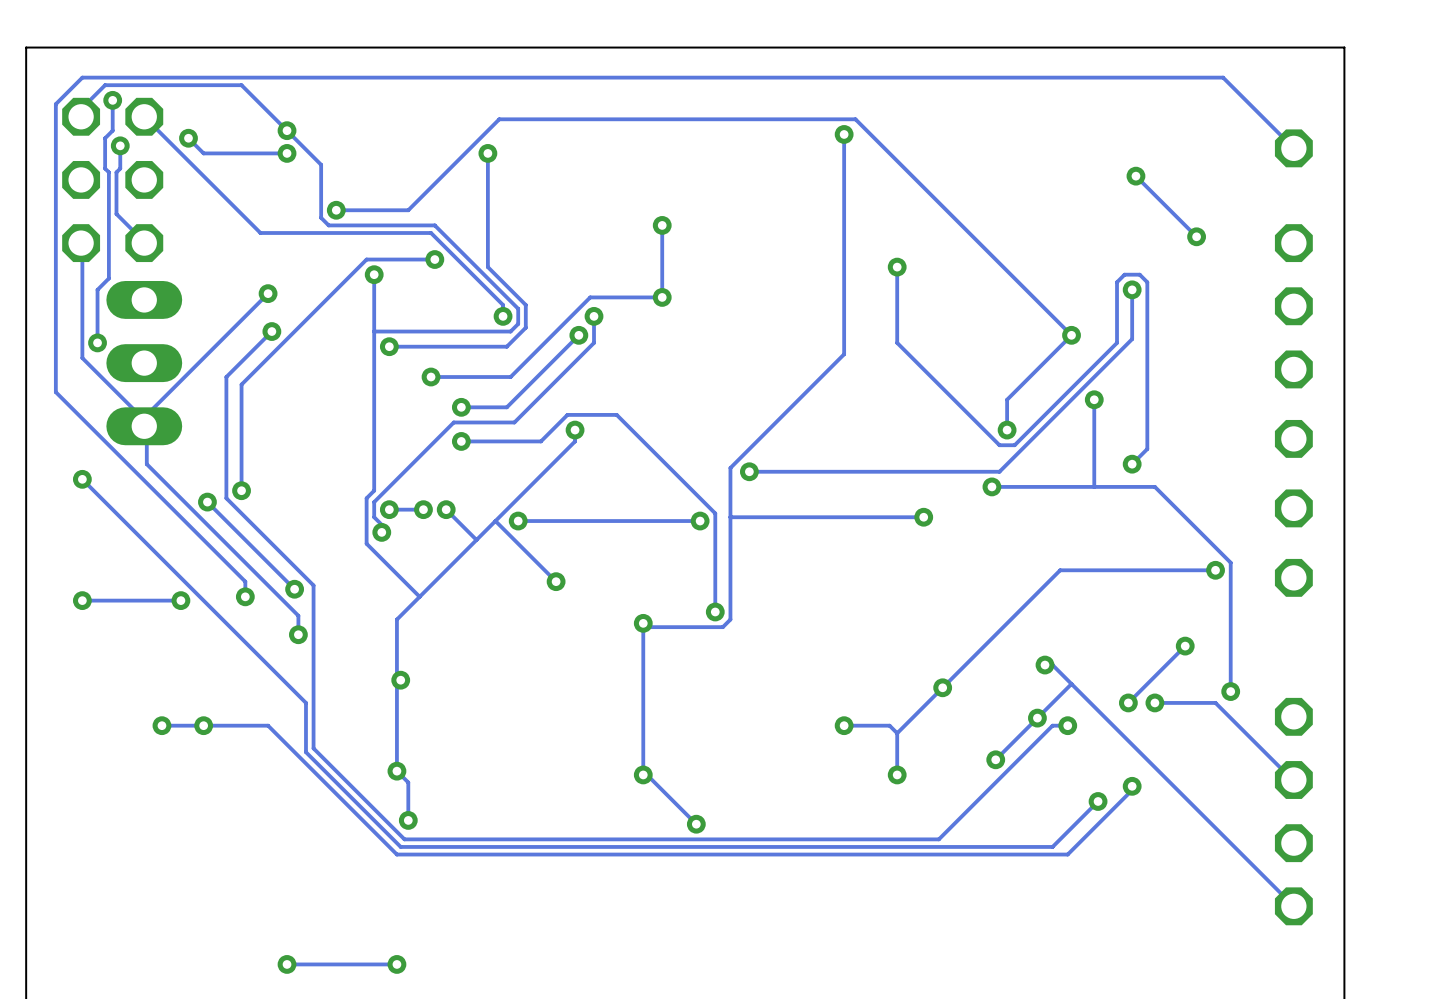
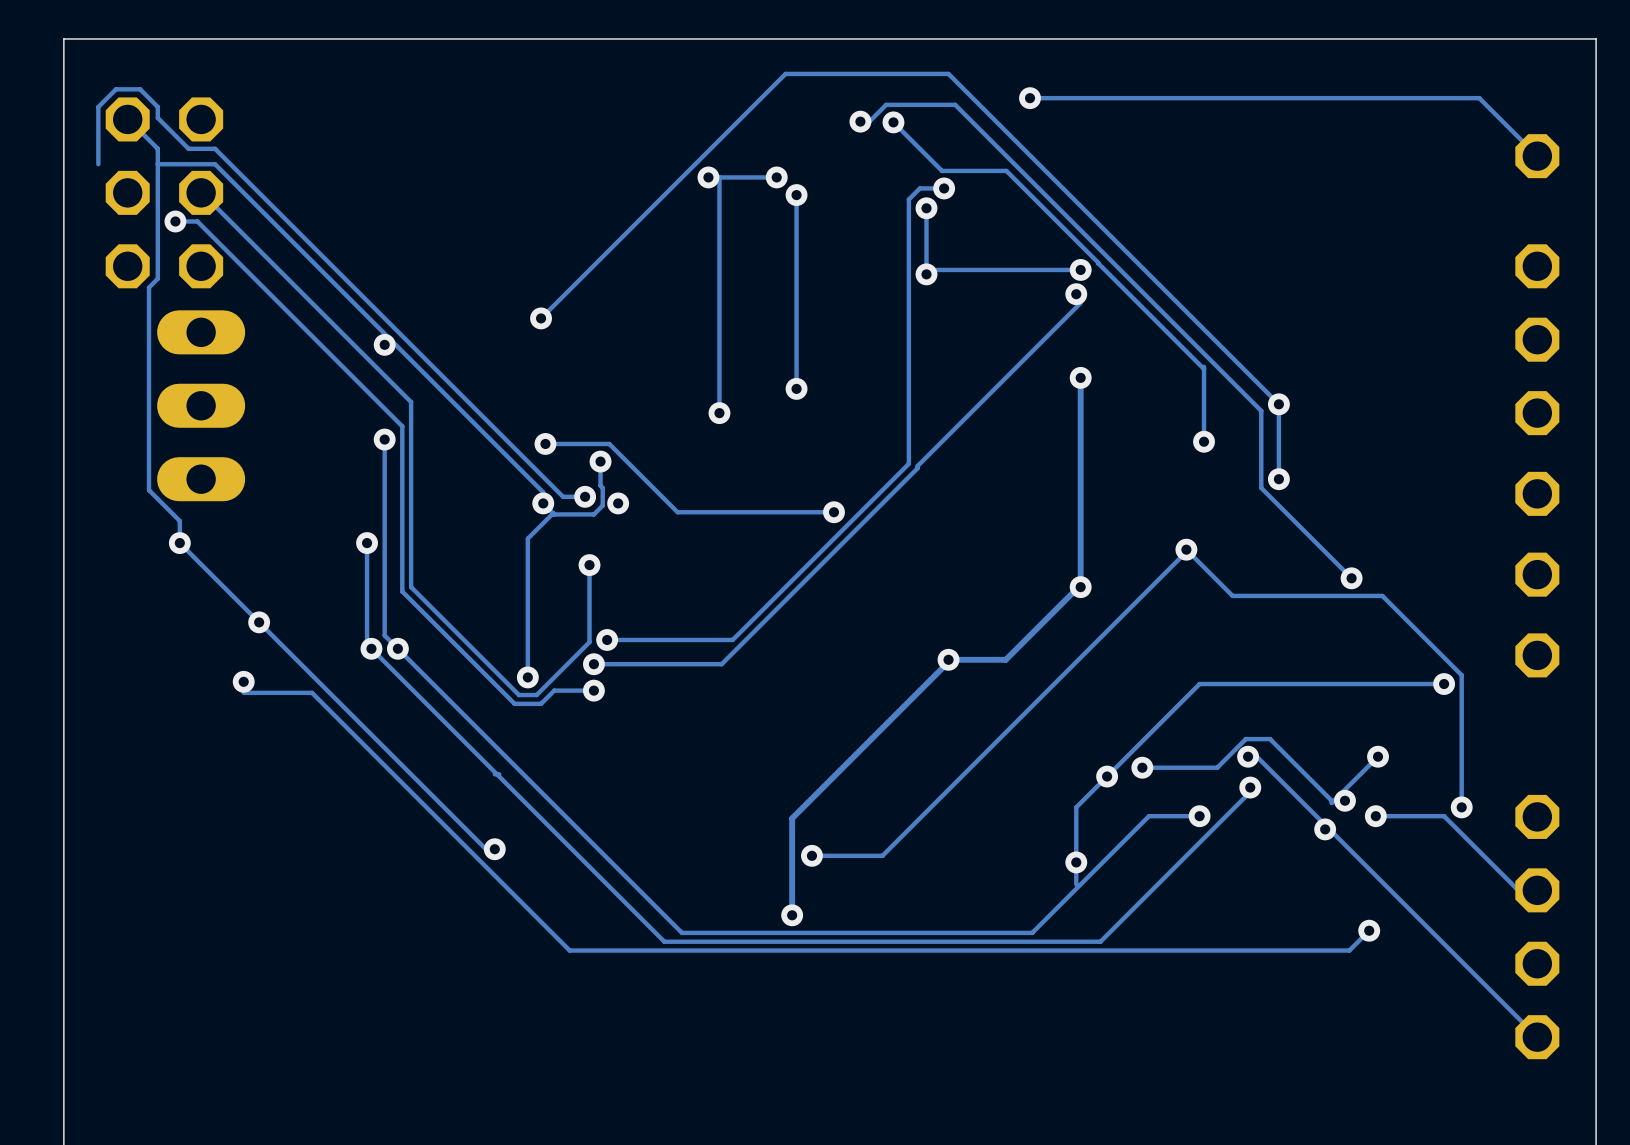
track: (647, 77) (82, 77) (55, 106) -> (569, 496) (563, 496) (215, 148) (188, 148) (157, 117) (157, 106) (140, 89) (115, 89) (98, 106)
track: none -> (785, 73) (541, 318)
track: (787, 77) (1223, 77) (1243, 98) -> (1030, 98) (1479, 98)
track: none -> (948, 73) (1278, 404) (1278, 479)
via: none -> (1030, 98)
track: (112, 100) (112, 130) (105, 138) (105, 168) (108, 172) (108, 278) (97, 289) (97, 342) -> none
via: (112, 100) -> none
track: (81, 116) (82, 107) (105, 85) (241, 85) (321, 164) (321, 217) (328, 225) (434, 225) (518, 308) (518, 323) (510, 331) (374, 331) -> none
track: (144, 116) (260, 233) (431, 233) (503, 305) (503, 316) -> none
track: none -> (860, 121) (869, 121) (886, 104) (955, 104) (1261, 410) (1261, 488) (1351, 578)
via: none -> (860, 121)
track: none -> (893, 122) (942, 170) (1006, 170) (1098, 262)
via: none -> (893, 122)
via: (287, 130) -> none
track: (844, 134) (844, 354) (730, 467) (730, 619) (722, 627) (643, 627) -> none
via: (844, 134) -> none
track: (188, 138) (203, 153) (287, 153) -> none
via: (188, 138) -> none
track: (120, 145) (120, 168) (116, 172) (116, 214) (144, 243) -> none
via: (120, 145) -> none
via: (287, 153) -> none
track: (487, 153) (487, 267) (525, 305) (525, 327) (506, 346) (389, 346) -> none
via: (487, 153) -> none
track: (55, 155) (55, 392) (99, 435) -> (127, 119) (157, 148) (157, 278) (149, 287) (149, 490)
track: none -> (157, 164) (215, 164) (543, 492) (543, 503) (554, 514) (593, 514) (602, 505) (600, 461)
via: none -> (708, 177)
track: none -> (719, 177) (719, 413)
track: none -> (776, 177) (708, 177)
via: none -> (776, 177)
track: none -> (944, 188) (919, 188) (908, 199) (908, 463) (732, 639) (607, 639)
via: none -> (944, 188)
track: (1135, 176) (1196, 236) -> none
via: (1135, 176) -> none
track: none -> (201, 192) (411, 402) (411, 587) (519, 695) (536, 695) (589, 642) (589, 565)
track: none -> (796, 195) (796, 388)
via: none -> (796, 195)
track: none -> (926, 208) (926, 274)
via: none -> (926, 208)
track: none -> (175, 221) (197, 221) (402, 426) (402, 591) (514, 703) (541, 703) (554, 690) (593, 690)
via: none -> (175, 221)
track: (336, 210) (408, 210) (499, 119) (855, 119) (1071, 335) (1007, 399) (1007, 430) -> none
via: (336, 210) -> none
track: (662, 225) (662, 297) (590, 297) (510, 377) (431, 377) -> none
via: (662, 225) -> none
via: (1196, 236) -> none
track: none -> (1098, 263) (1204, 369)
track: (81, 243) (82, 358) (143, 418) -> none
track: none -> (1080, 269) (926, 269)
via: none -> (1080, 269)
via: none -> (926, 274)
track: (434, 259) (366, 259) (241, 384) (241, 490) -> none
via position: (434, 259) -> (541, 318)
track: (897, 267) (897, 342) (999, 445) (1014, 445) (1117, 342) (1117, 282) (1124, 274) (1139, 274) (1147, 282) (1147, 449) (1132, 464) -> none
track: (374, 274) (374, 490) (366, 498) (366, 543) (419, 596) -> none
via: (374, 274) -> none
track: none -> (1080, 302) (721, 664) (593, 664)
track: (1132, 289) (1132, 339) (999, 471) (749, 471) -> none
via: (1132, 289) -> none
track: (268, 293) (143, 418) -> none
via: (268, 293) -> none
via: (662, 297) -> none
via: none -> (384, 344)
via: (503, 316) -> none
track: (594, 316) (594, 342) (514, 422) (453, 422) (374, 502) (374, 517) (381, 524) (381, 532) -> none
via: (594, 316) -> none
track: none -> (1204, 366) (1204, 441)
track: (271, 331) (226, 377) (226, 498) (313, 585) (313, 748) (404, 839) (938, 839) (1052, 725) (1067, 725) -> none
via: (271, 331) -> none
track: (578, 335) (506, 407) (461, 407) -> none
via: (578, 335) -> none
via: (1071, 335) -> none
track: none -> (1080, 377) (1080, 587) (1078, 587) (1005, 659) (948, 659) (948, 662) (792, 818) (792, 915)
via: none -> (1080, 377)
via: (97, 342) -> none
via: (389, 346) -> none
via: none -> (796, 388)
via: none -> (1278, 404)
via: none -> (719, 413)
via: (431, 377) -> none
track: none -> (384, 439) (384, 635) (682, 932) (1032, 932) (1148, 816) (1199, 816)
via: none -> (384, 439)
via: none -> (1204, 441)
track: none -> (545, 443) (609, 443) (677, 512) (834, 512)
via: none -> (545, 443)
track: (1094, 399) (1094, 486) -> none
via: (1094, 399) -> none
via: (461, 407) -> none
via: none -> (600, 461)
track: (143, 418) (143, 426) (146, 426) (146, 464) (298, 615) (298, 634) -> none
via: none -> (1278, 479)
track: (575, 430) (575, 441) (396, 619) (396, 771) (408, 782) (408, 820) -> none
via: (575, 430) -> none
via: (1007, 430) -> none
via position: (461, 441) -> (585, 496)
track: (474, 441) (540, 441) (567, 414) (616, 414) (715, 513) (715, 611) -> none
via: none -> (543, 503)
via: none -> (618, 503)
via: none -> (834, 512)
track: none -> (553, 513) (527, 538) (527, 677)
track: (125, 462) (245, 581) (245, 596) -> (179, 521) (179, 543) (486, 849) (494, 849)
via: (1132, 464) -> none
via: (749, 471) -> none
track: (82, 479) (305, 702) (305, 752) (400, 846) (1052, 846) (1098, 801) -> none
via: (82, 479) -> none
via: none -> (179, 543)
track: none -> (367, 543) (367, 644) (664, 941) (1100, 941) (1250, 791) (1250, 787)
via: none -> (367, 543)
track: (991, 486) (1154, 486) (1230, 562) (1230, 691) -> none
via: (241, 490) -> none
via: none -> (589, 565)
track: (207, 502) (294, 589) -> none
via: (207, 502) -> none
via: (389, 509) -> none
track: (423, 509) (389, 509) -> none
via: (423, 509) -> none
track: (446, 509) (476, 539) -> none
via: (446, 509) -> none
via: none -> (1351, 578)
track: (923, 517) (730, 517) -> none
via position: (923, 517) -> (1080, 587)
track: (495, 521) (556, 581) -> none
via: (518, 521) -> none
track: (700, 521) (518, 521) -> none
via: (700, 521) -> none
via: (381, 532) -> none
via: none -> (259, 622)
via: none -> (607, 639)
track: (1215, 570) (1060, 570) (897, 733) (889, 725) (844, 725) -> none
via: (1215, 570) -> none
via: none -> (397, 648)
via: (556, 581) -> none
via: none -> (948, 659)
via: none -> (593, 664)
via position: (294, 589) -> (371, 648)
via: (245, 596) -> none
via: none -> (527, 677)
via: (82, 600) -> none
track: (180, 600) (82, 600) -> none
track: none -> (1444, 684) (1199, 684) (1076, 807) (1076, 836)
via: none -> (1444, 684)
via: none -> (593, 690)
track: none -> (243, 692) (311, 692) (569, 950) (1349, 950) (1369, 930)
via: (715, 611) -> none
track: (643, 623) (643, 774) -> none
via: (643, 623) -> none
via: (298, 634) -> none
track: (1185, 646) (1128, 702) -> none
via: (1185, 646) -> none
track: none -> (1378, 756) (1331, 802) (1331, 800) (1270, 739) (1245, 739) (1217, 767) (1142, 767)
via: none -> (1378, 756)
via: (400, 680) -> none
via: none -> (1107, 776)
track: (1071, 683) (995, 759) -> none
via position: (942, 687) -> (1142, 767)
via: none -> (1250, 787)
via position: (1230, 691) -> (1461, 807)
track: (1154, 702) (1215, 702) (1293, 780) -> (1375, 816) (1444, 816) (1516, 888) (1537, 890)
via position: (1154, 702) -> (1375, 816)
track: none -> (1461, 807) (1461, 675) (1382, 595) (1232, 595) (1186, 549) (1186, 551) (882, 855) (811, 855)
via: none -> (1199, 816)
via: (1037, 718) -> none
track: (161, 725) (268, 725) (396, 854) (1067, 854) (1132, 790) (1132, 786) -> none
via: (161, 725) -> none
via: (203, 725) -> none
via: (844, 725) -> none
via: (1067, 725) -> none
via: none -> (1325, 829)
via: none -> (811, 855)
via: (995, 759) -> none
via position: (396, 771) -> (494, 849)
track: (643, 771) (696, 824) -> none
via: (643, 774) -> none
via position: (897, 774) -> (1076, 862)
via: (1132, 786) -> none
via: none -> (792, 915)
via: (1098, 801) -> none
via: none -> (1369, 930)
via: (408, 820) -> none
via: (696, 824) -> none
via: (287, 964) -> none
track: (396, 964) (287, 964) -> none
via: (396, 964) -> none

